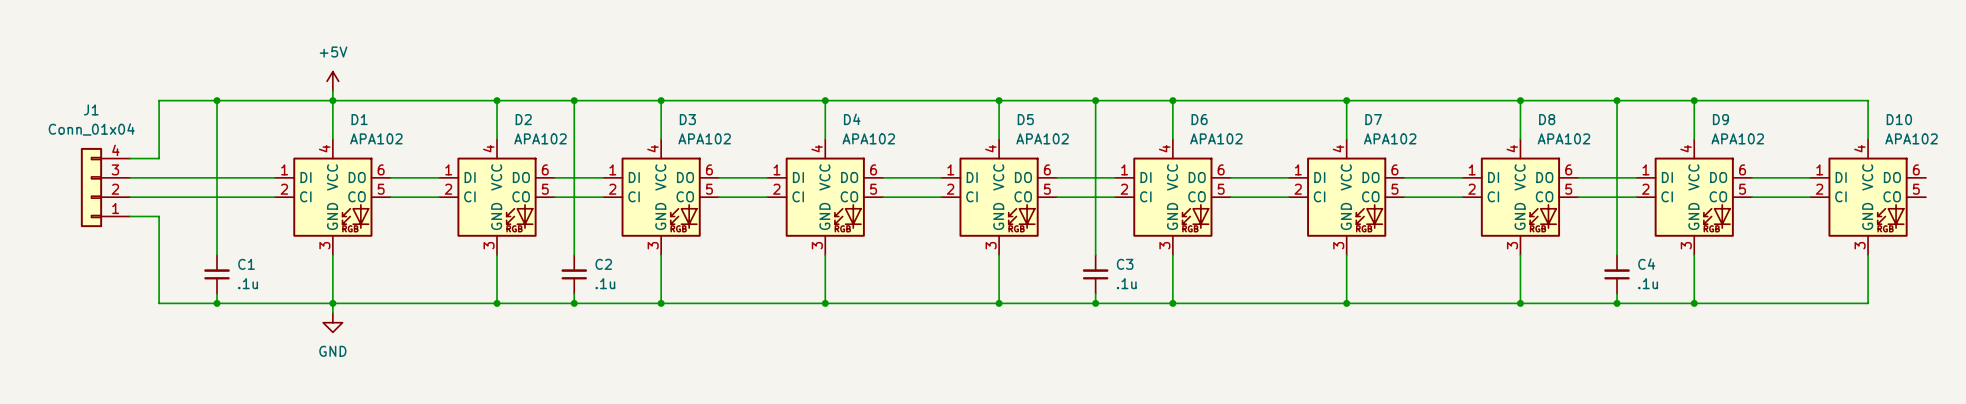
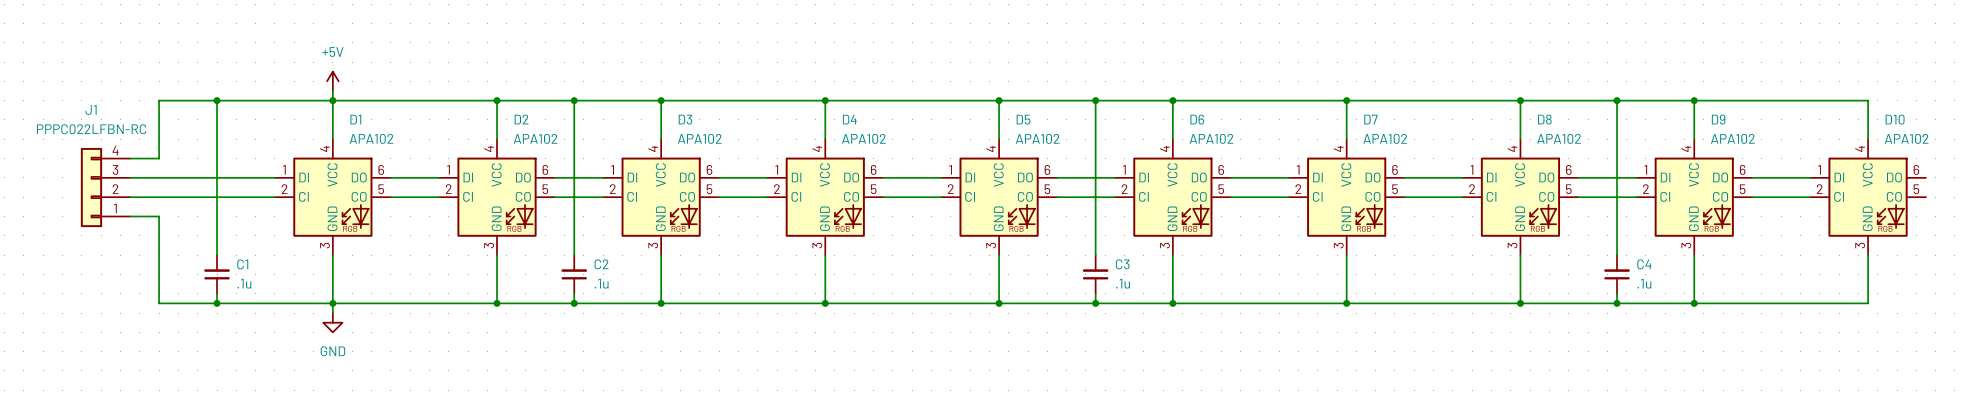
J1 value: Conn_01x04 (91, 129) -> PPPC022LFBN-RC (91, 129)

